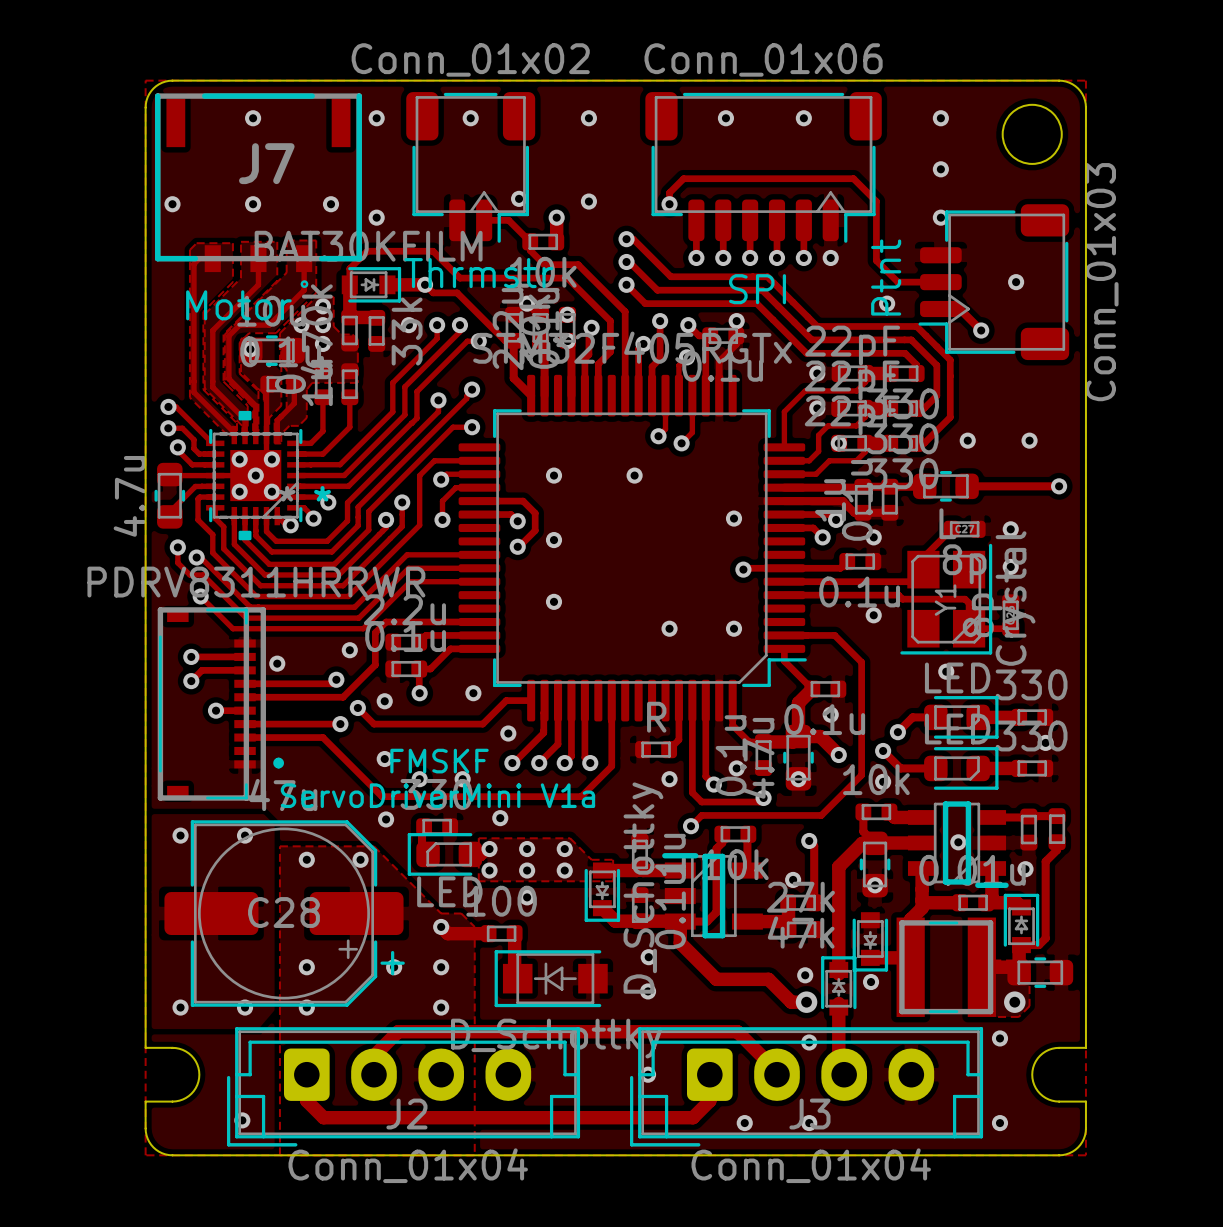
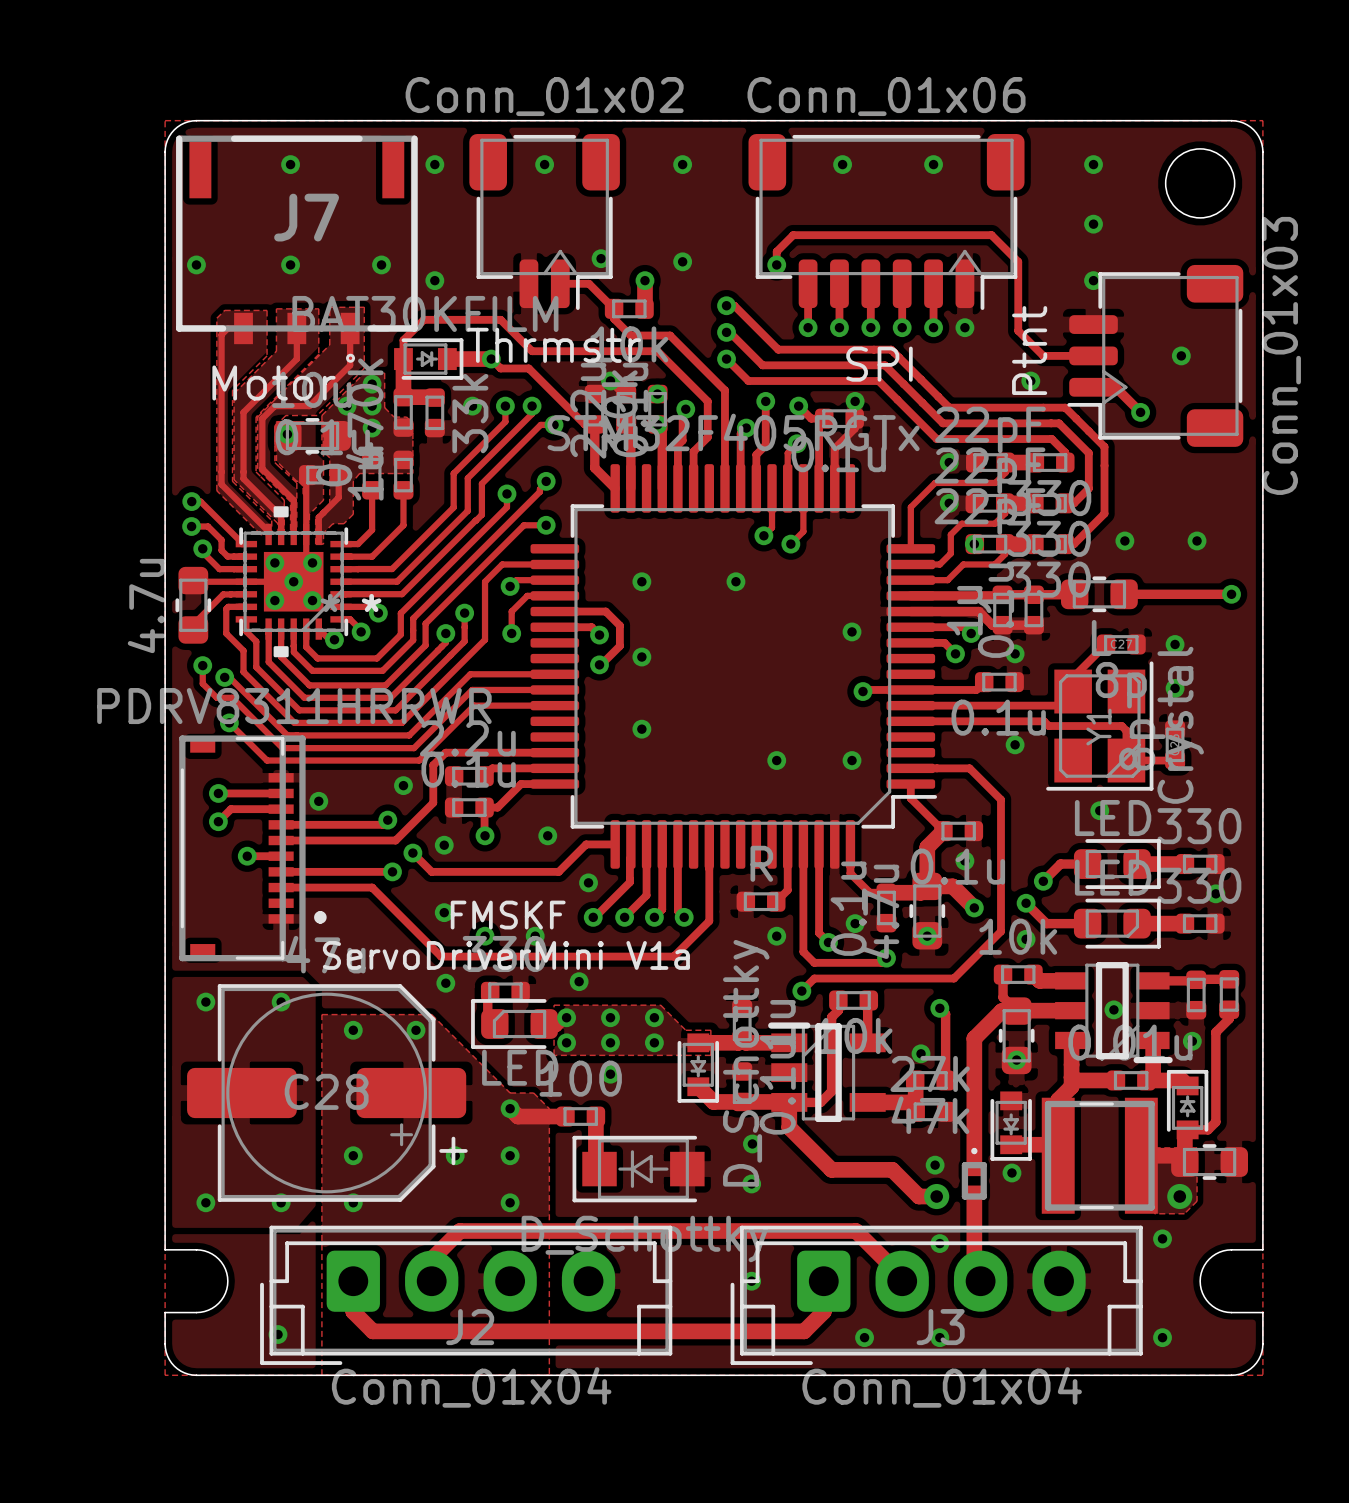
part footprint: [821, 956, 857, 1016] -> [961, 1147, 987, 1200]

